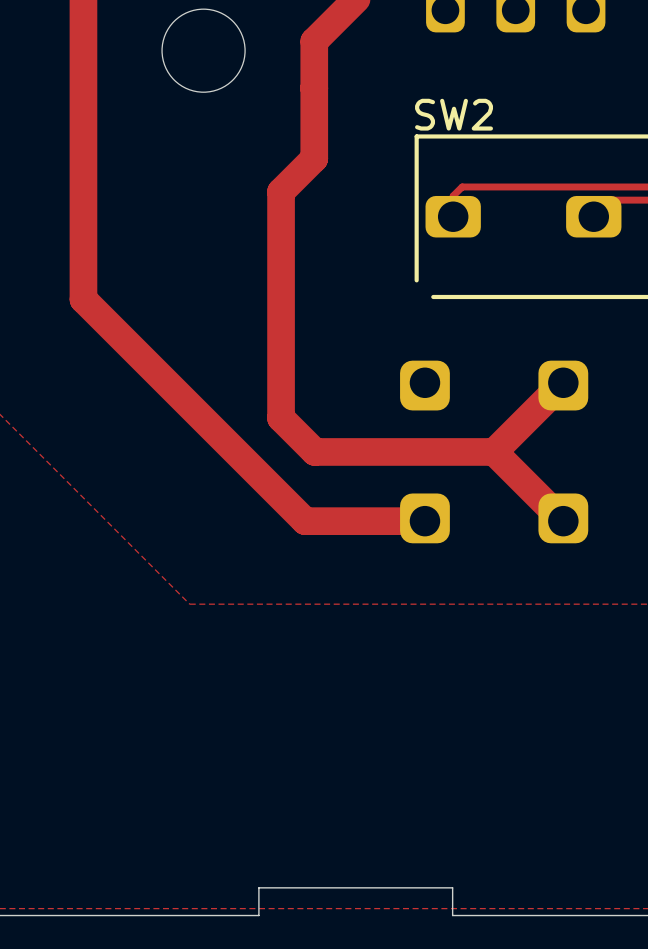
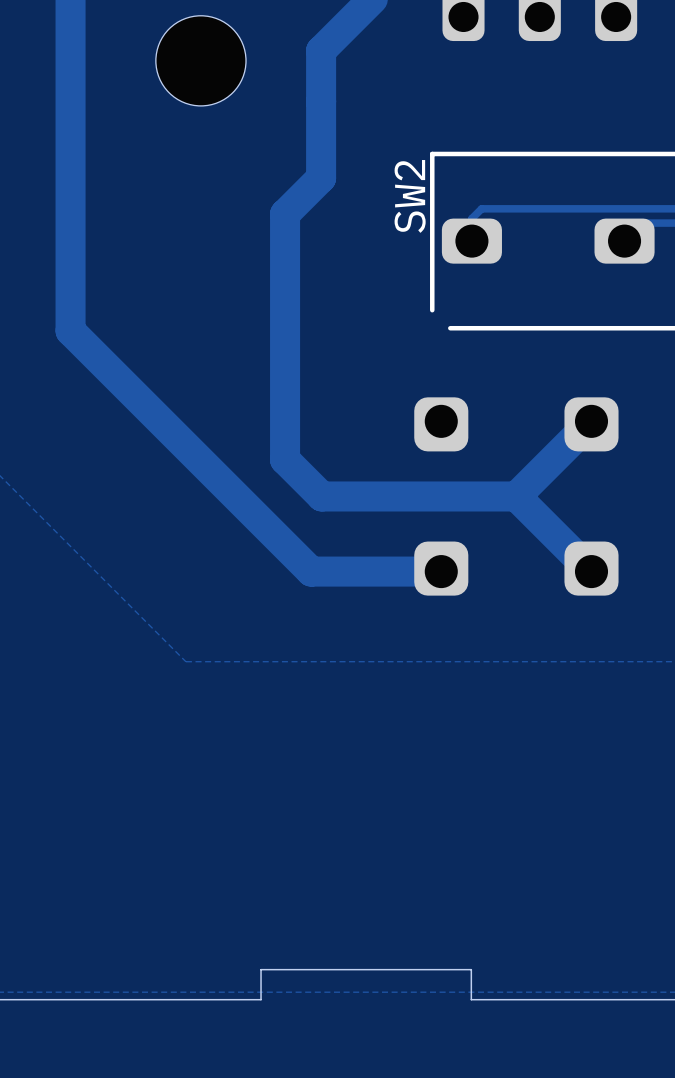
SW2 name rotation: 0° (454, 114) -> 90° counterclockwise (410, 196)

